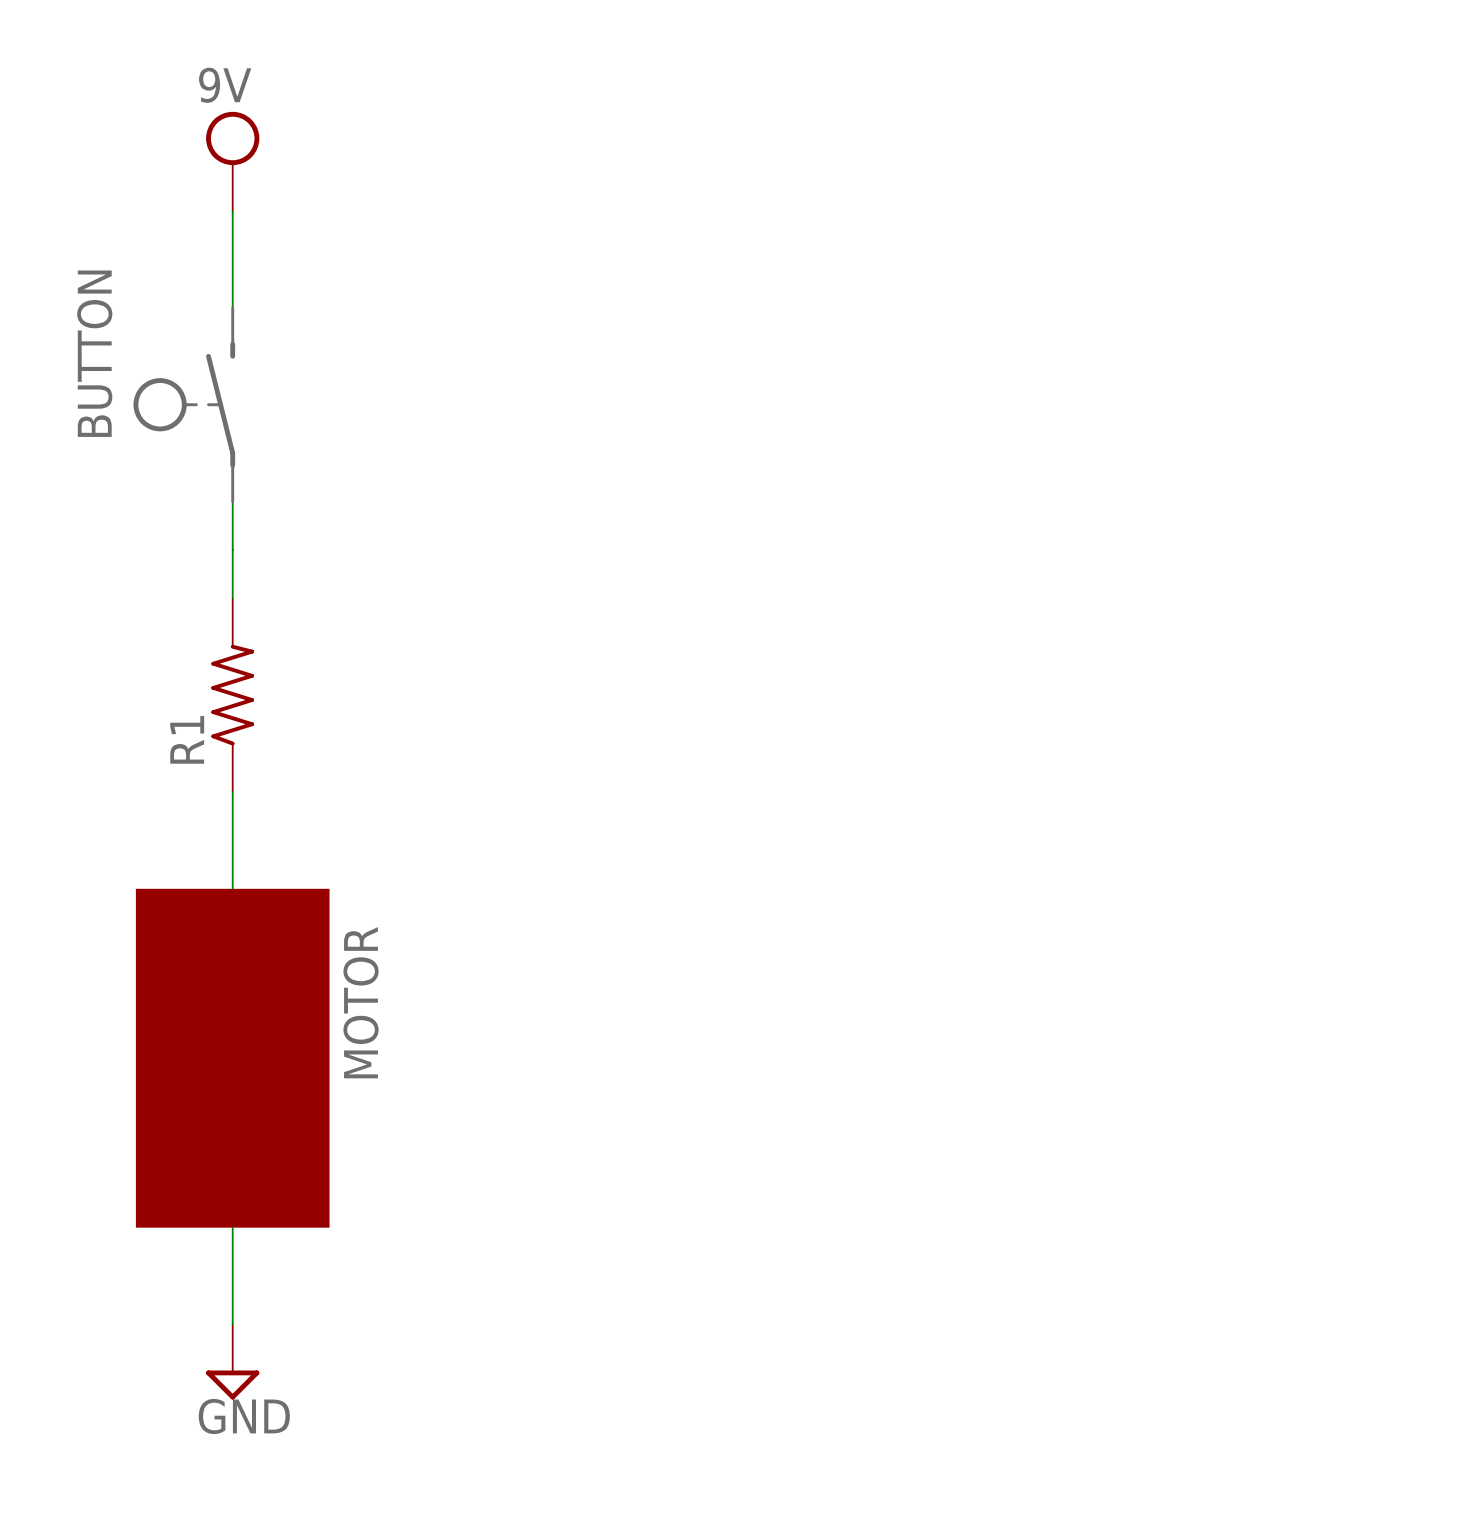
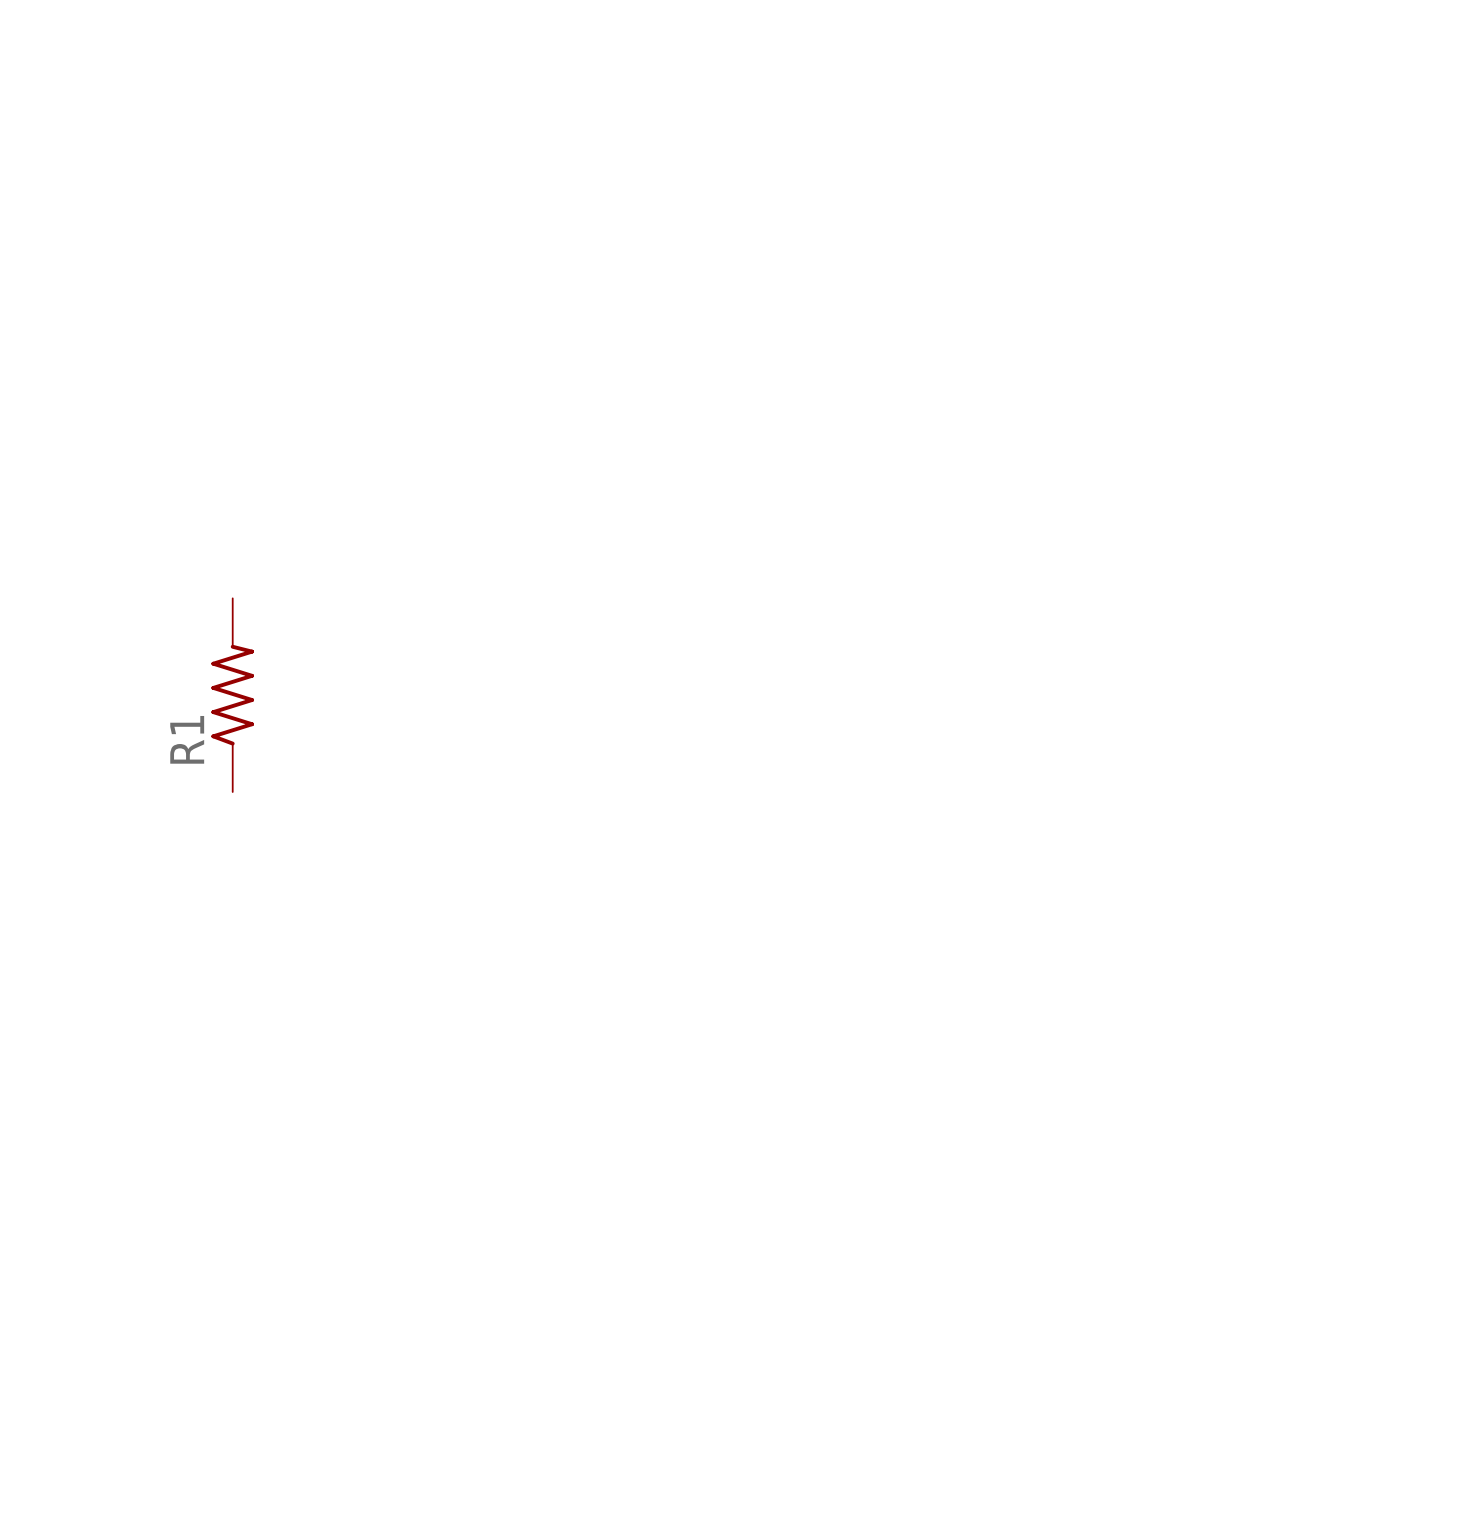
power symbol: 9V (232, 161) -> none
wire: (232, 211) (232, 307) -> none
BUTTON: (184, 404) -> none
wire: (232, 501) (232, 598) -> none
wire: (232, 792) (232, 888) -> none
drawing: [135, 888, 330, 1228] -> none
text: MOTOR (361, 1002) -> none
wire: (232, 1227) (232, 1324) -> none
power symbol: GND (232, 1362) -> none

